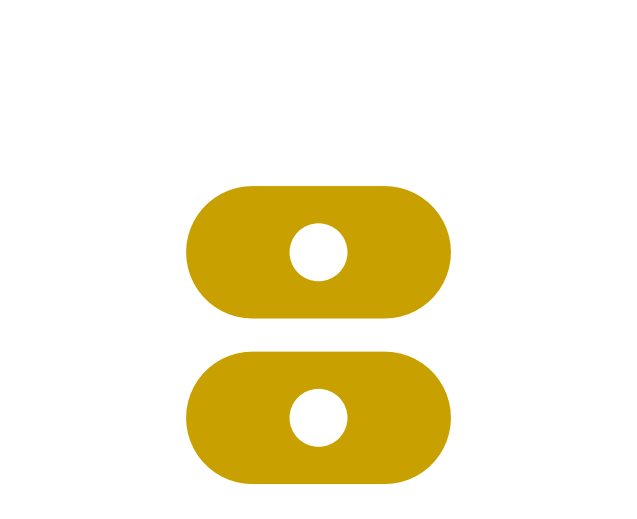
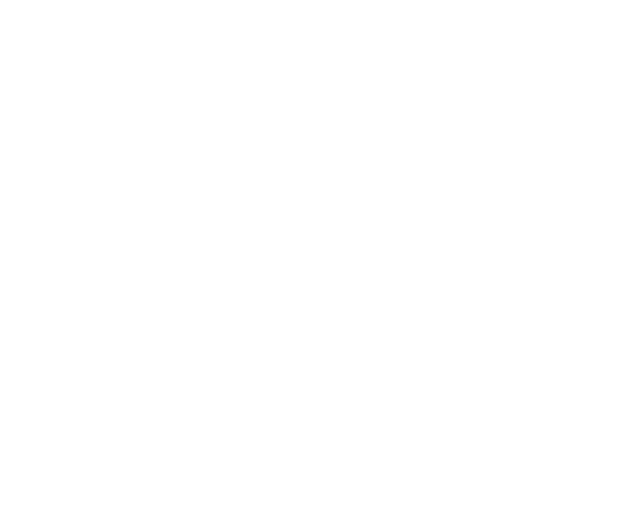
part: (318, 335) -> none

